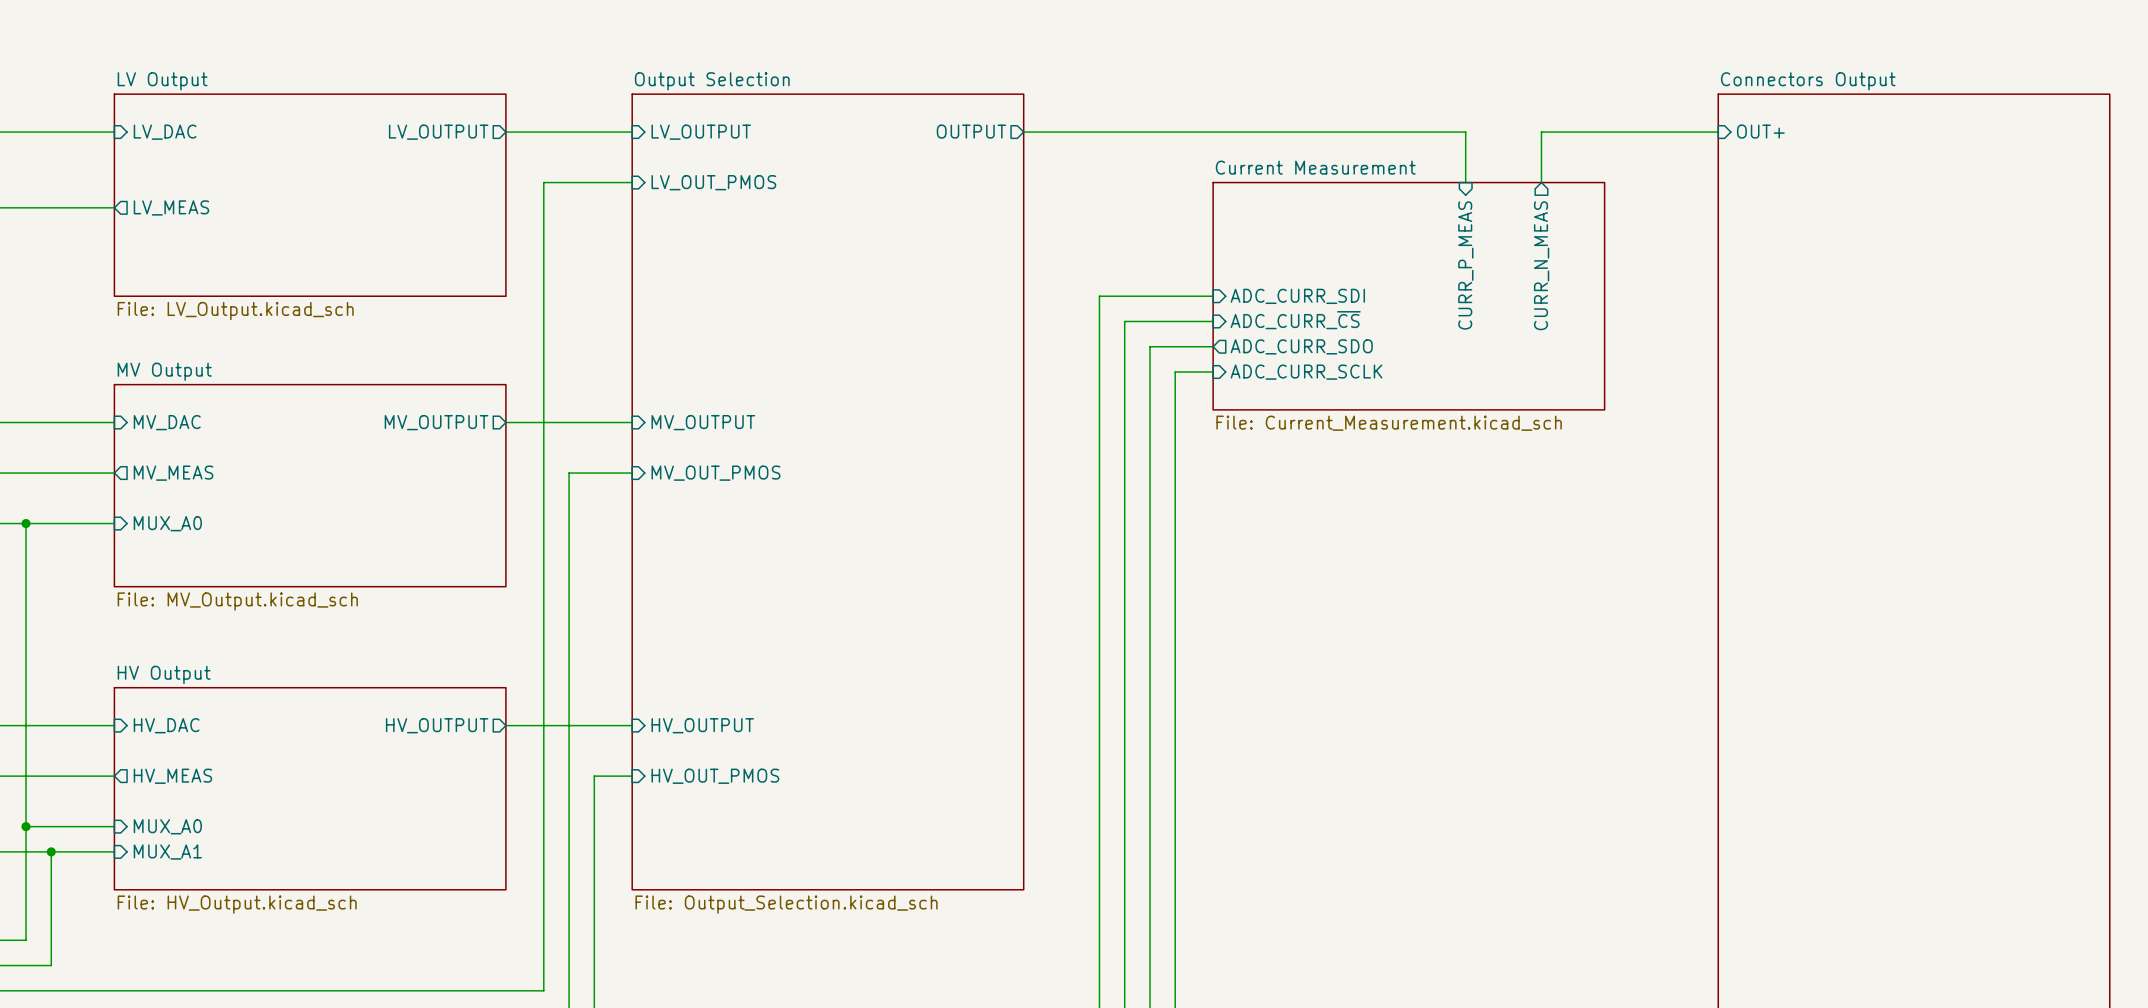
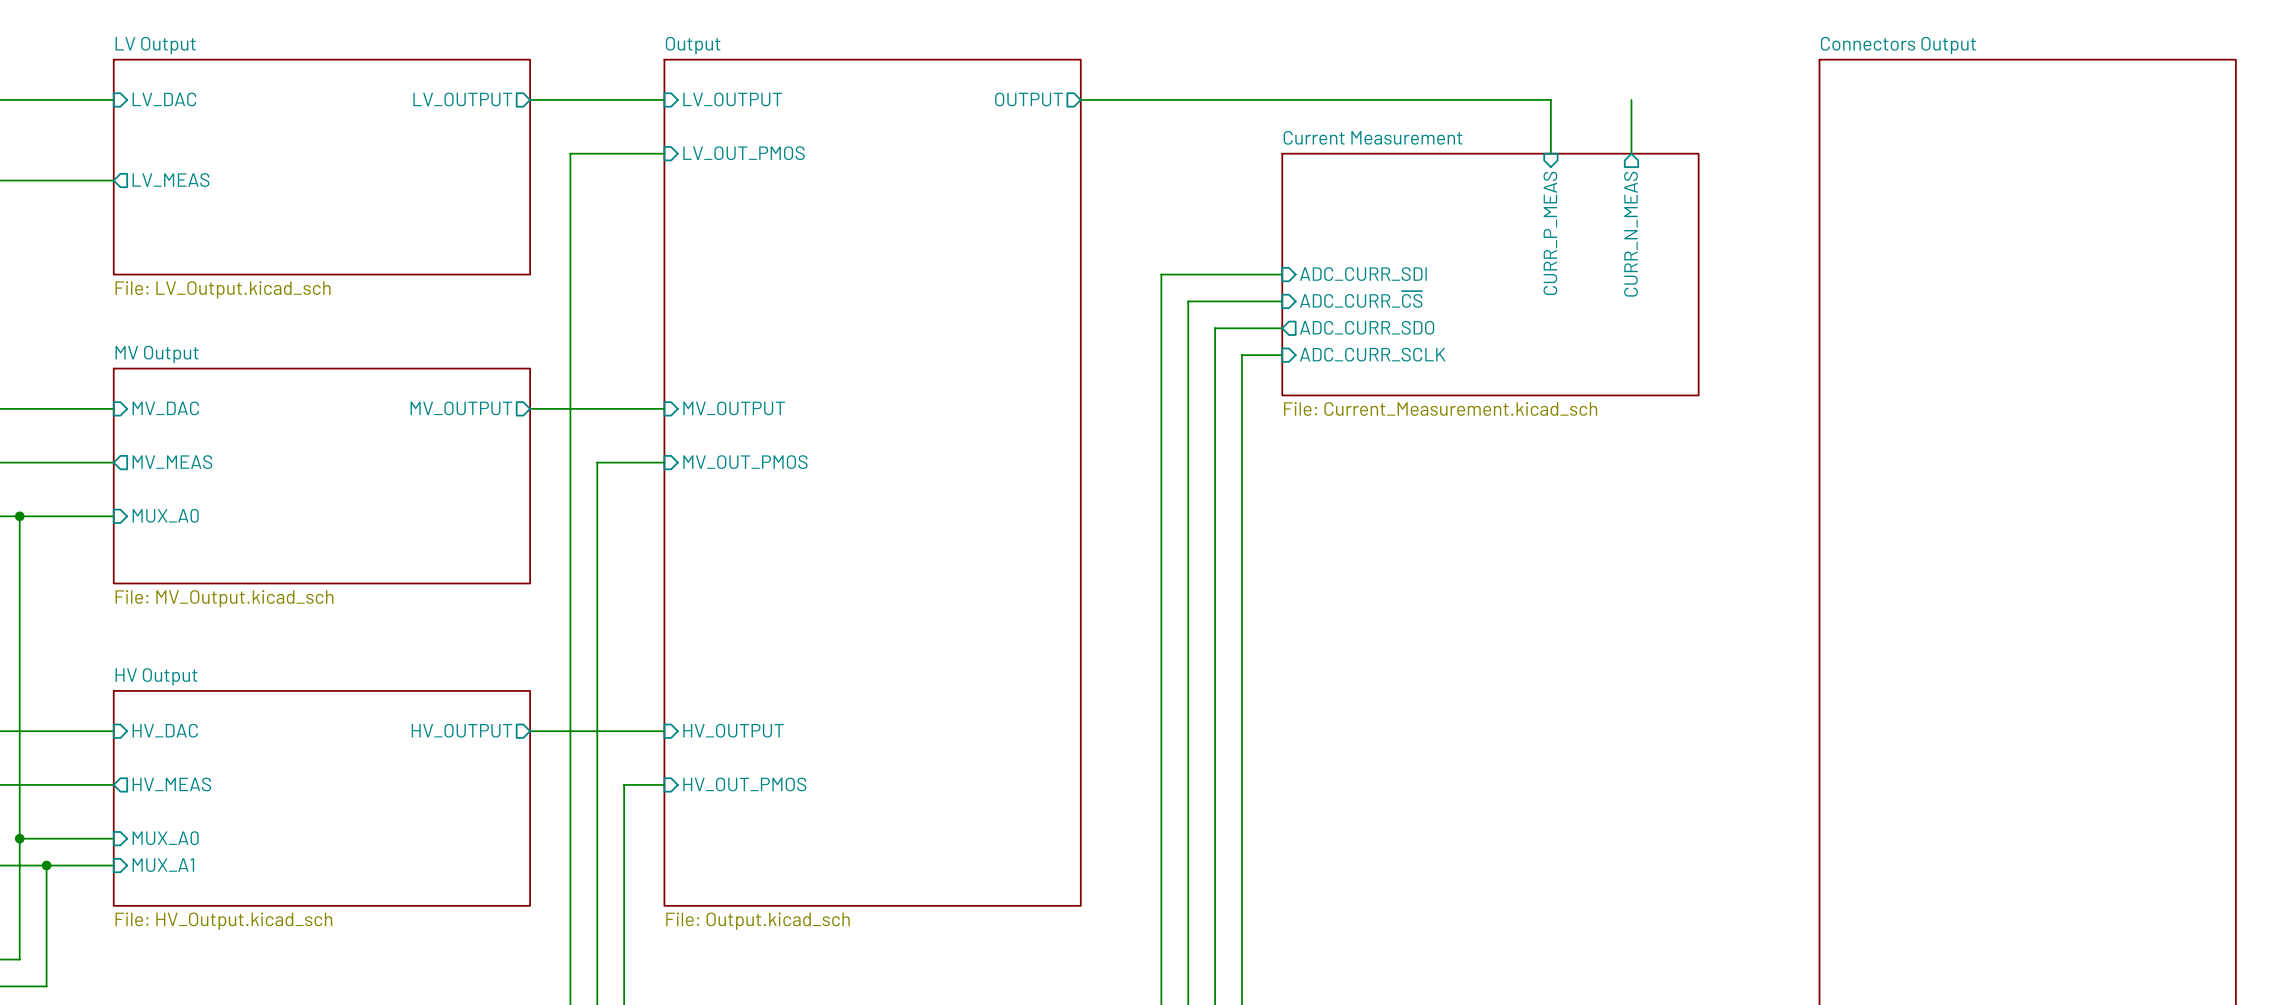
sheet Output Selection name: Output Selection (712, 81) -> Output (693, 45)
sheet pin: OUT+ (1760, 131) -> none
wire: (1541, 132) (1718, 132) -> none
sheet Output Selection value: File: Output_Selection.kicad_sch (786, 904) -> File: Output.kicad_sch (758, 921)

